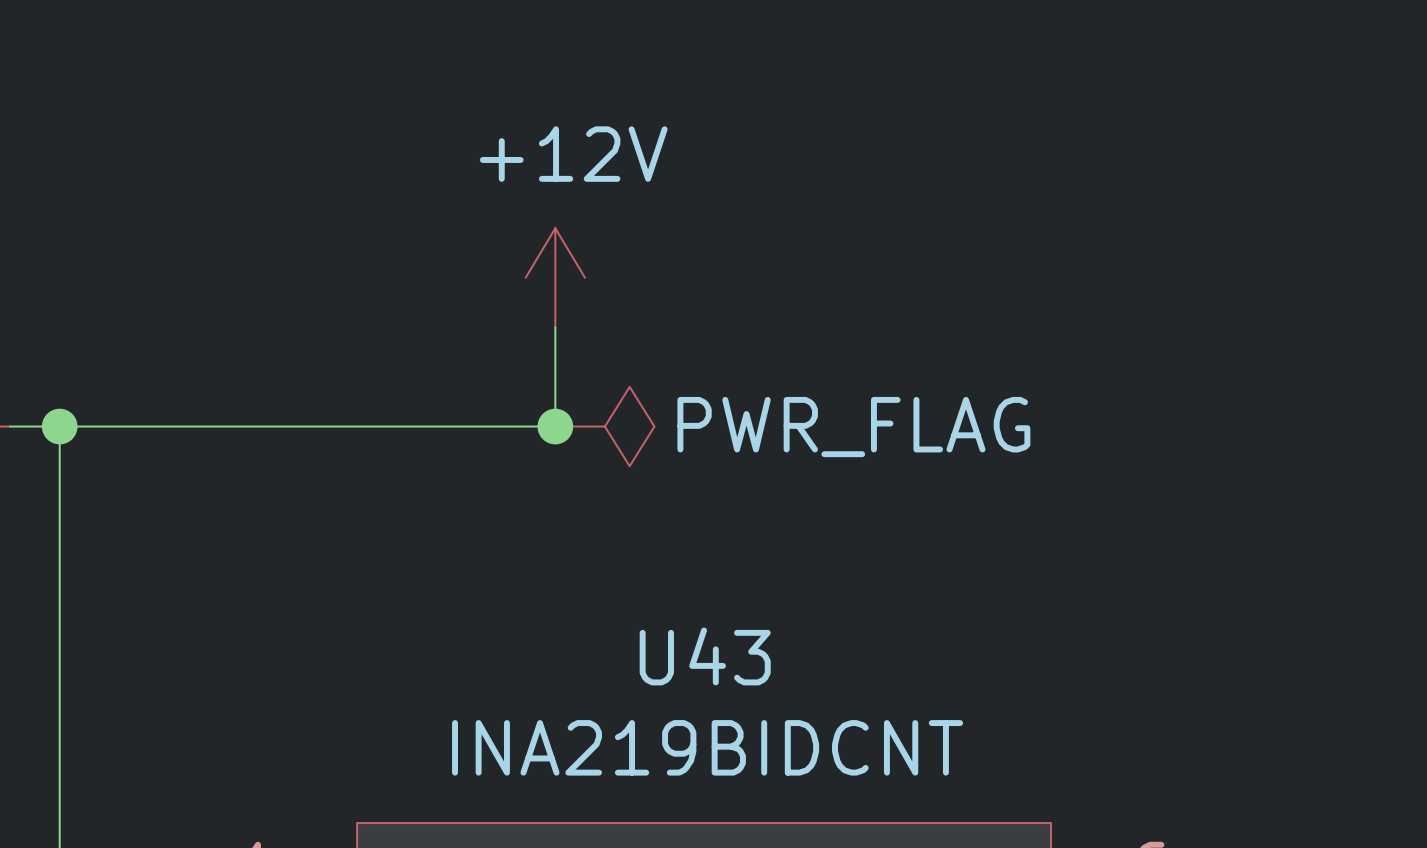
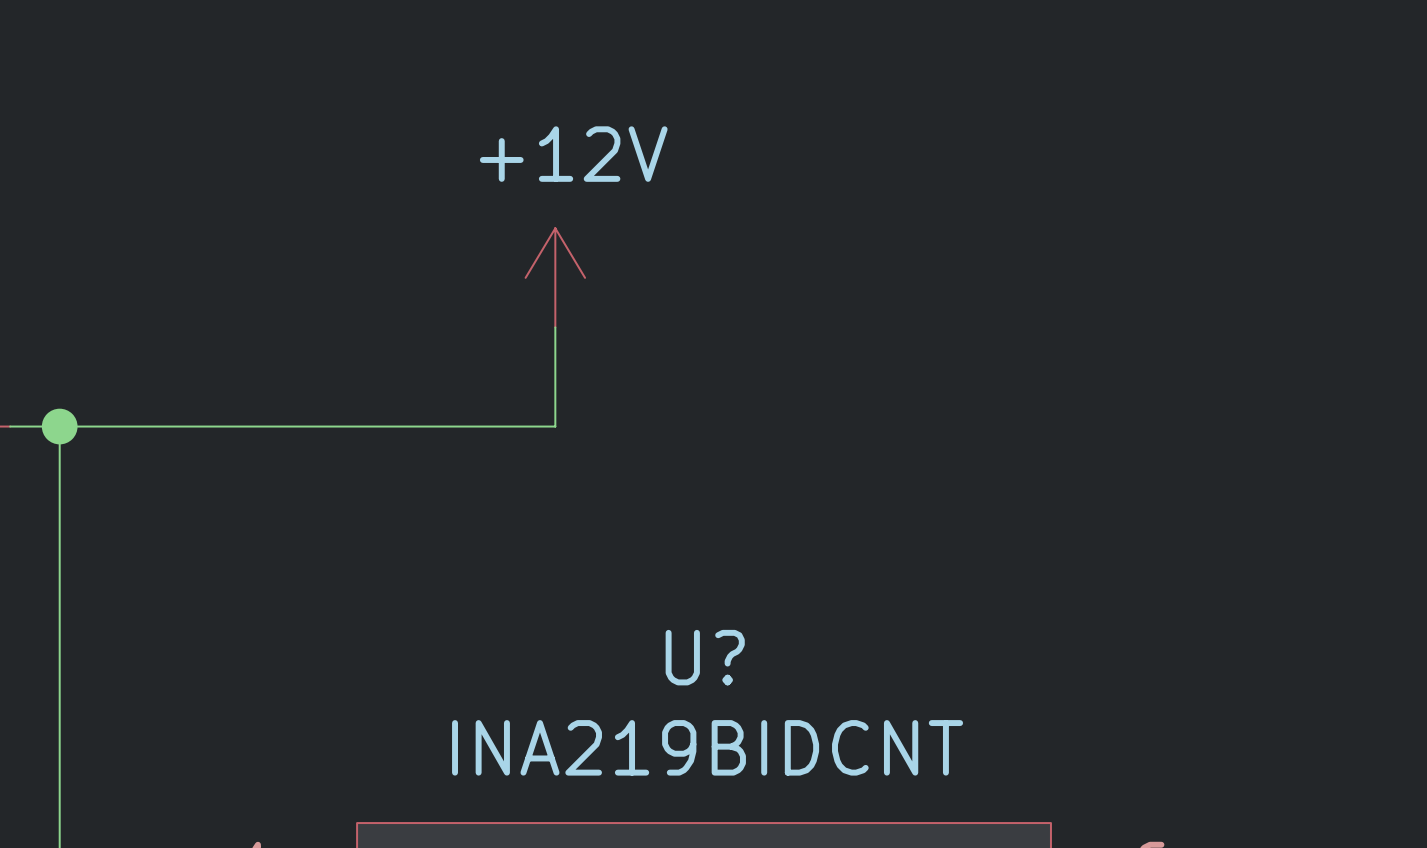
junction: (555, 426) -> none
power symbol: PWR_FLAG (604, 426) -> none
U43 name: U43 (705, 656) -> U? (705, 657)

